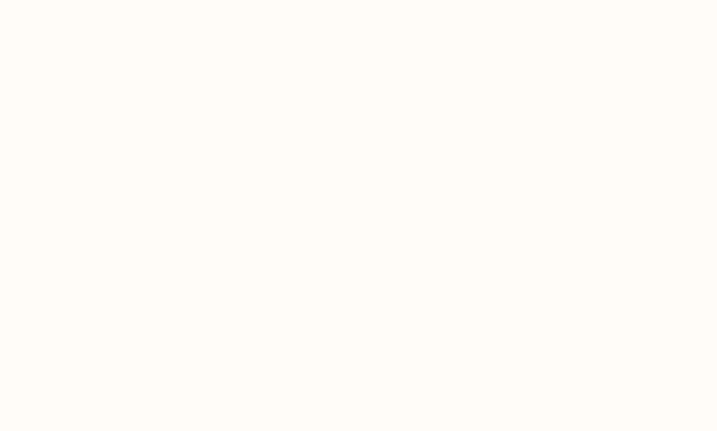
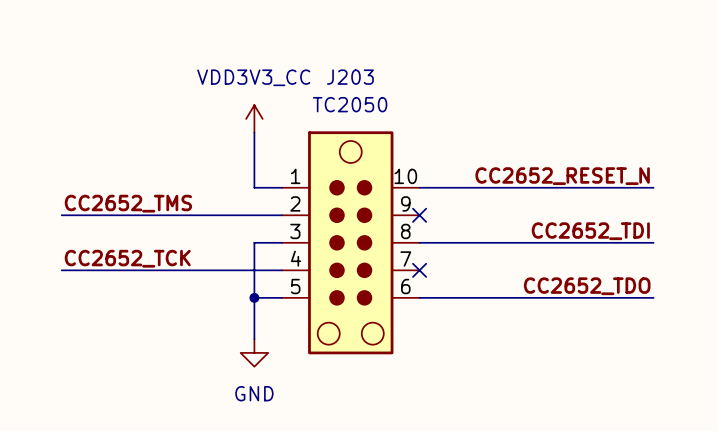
power symbol: none -> VDD3V3_CC (254, 118)
wire: none -> (254, 132) (254, 187) (281, 187)
label: none -> CC2652_RESET_N (562, 176)
wire: none -> (419, 187) (653, 187)
label: none -> CC2652_TMS (128, 203)
wire: none -> (61, 215) (281, 215)
no-connect mark: none -> (419, 215)
label: none -> CC2652_TDI (590, 231)
wire: none -> (281, 242) (254, 242) (254, 339)
J203: none -> TC2050 (350, 242)
wire: none -> (419, 242) (653, 242)
label: none -> CC2652_TCK (127, 258)
wire: none -> (61, 270) (281, 270)
no-connect mark: none -> (419, 270)
label: none -> CC2652_TDO (587, 286)
wire: none -> (254, 297) (281, 297)
junction: none -> (254, 297)
wire: none -> (419, 297) (653, 297)
power symbol: none -> GND (254, 352)

